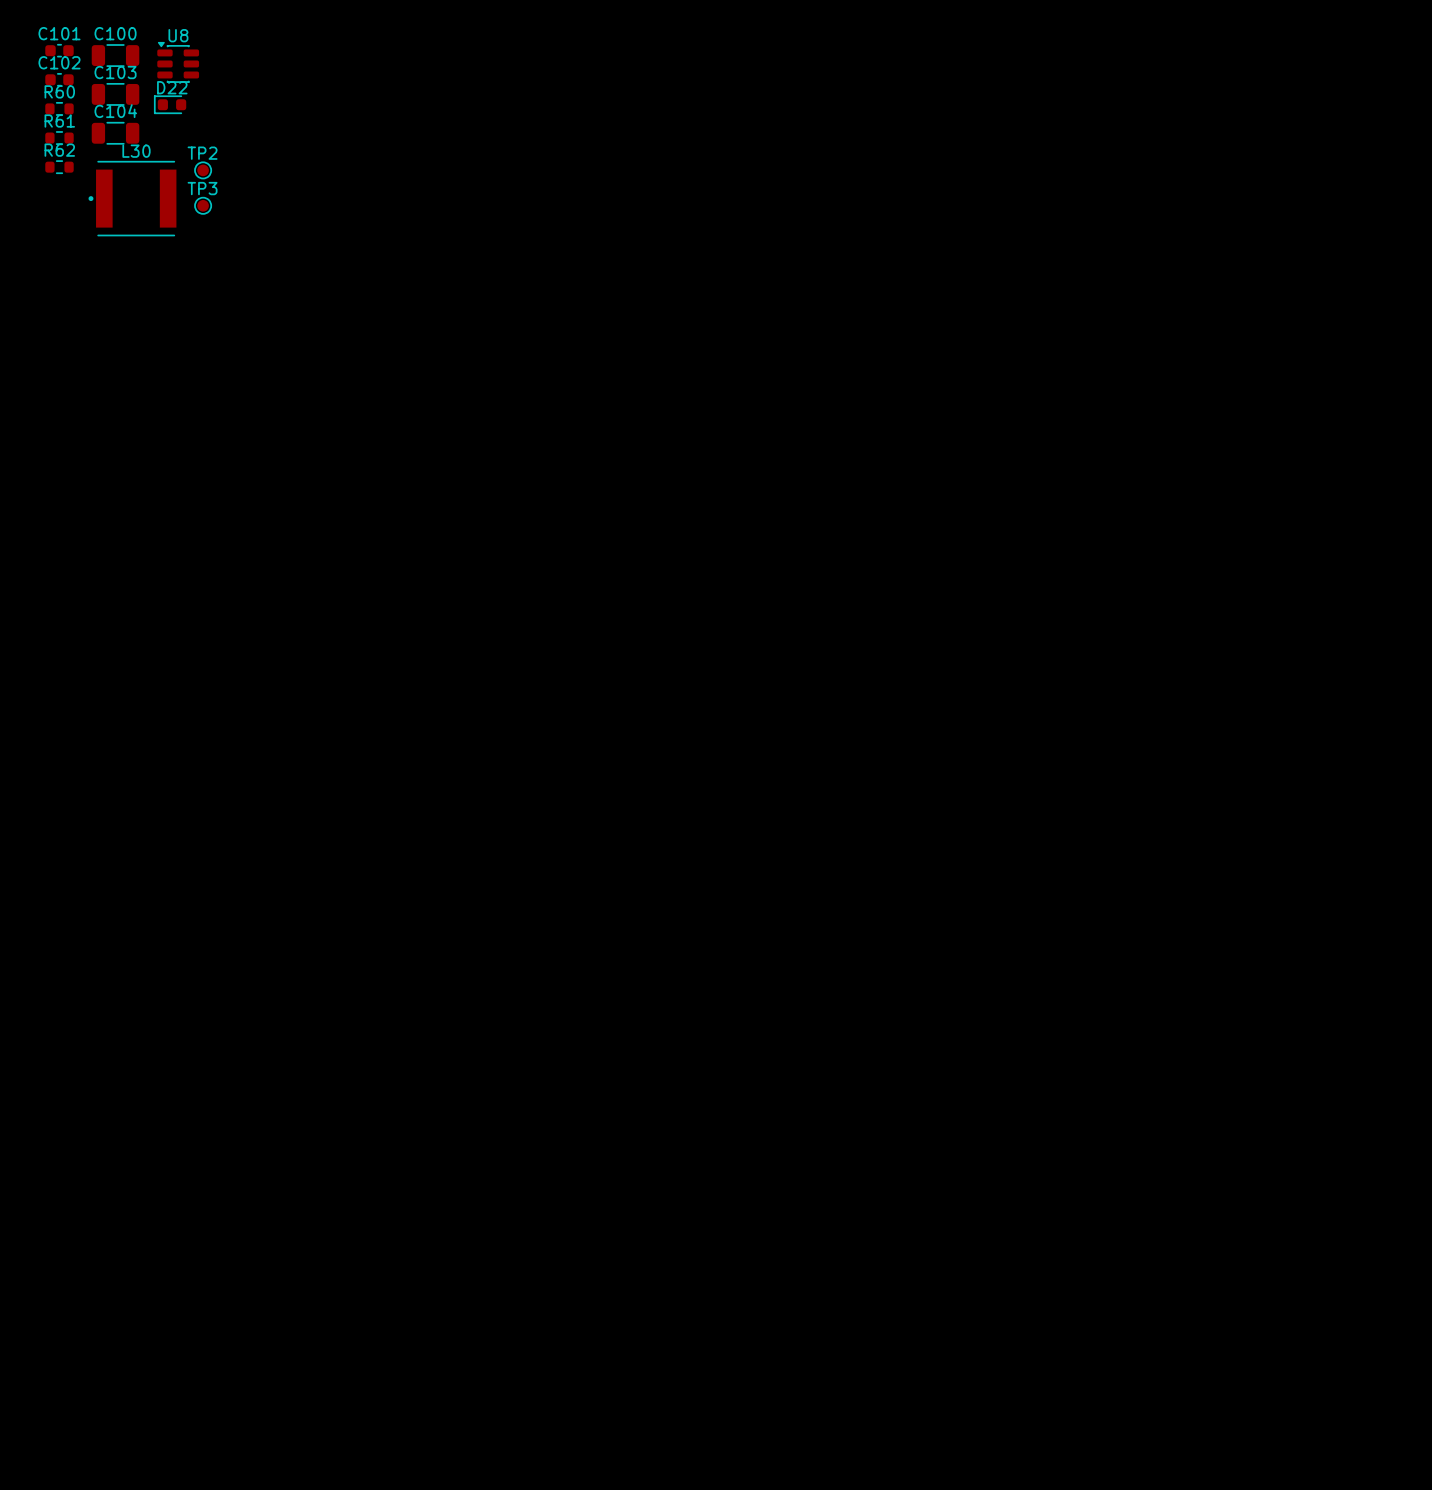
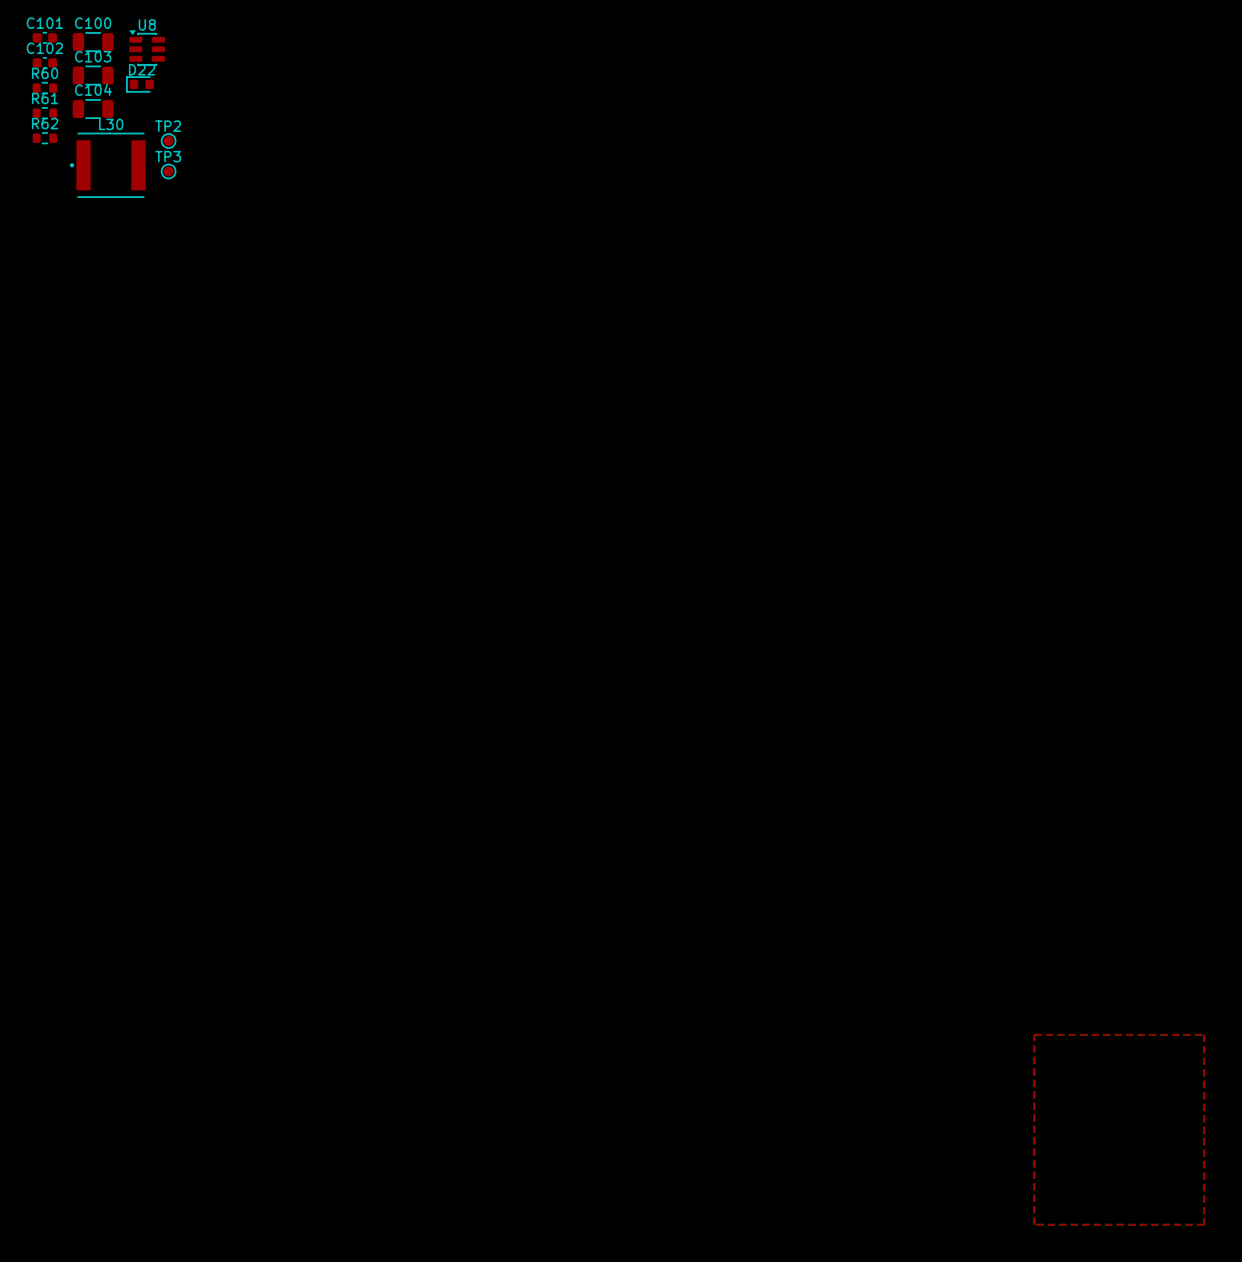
top zone outline: none -> (1034, 1034) (1204, 1034) (1204, 1224) (1034, 1224) (1034, 1034)

